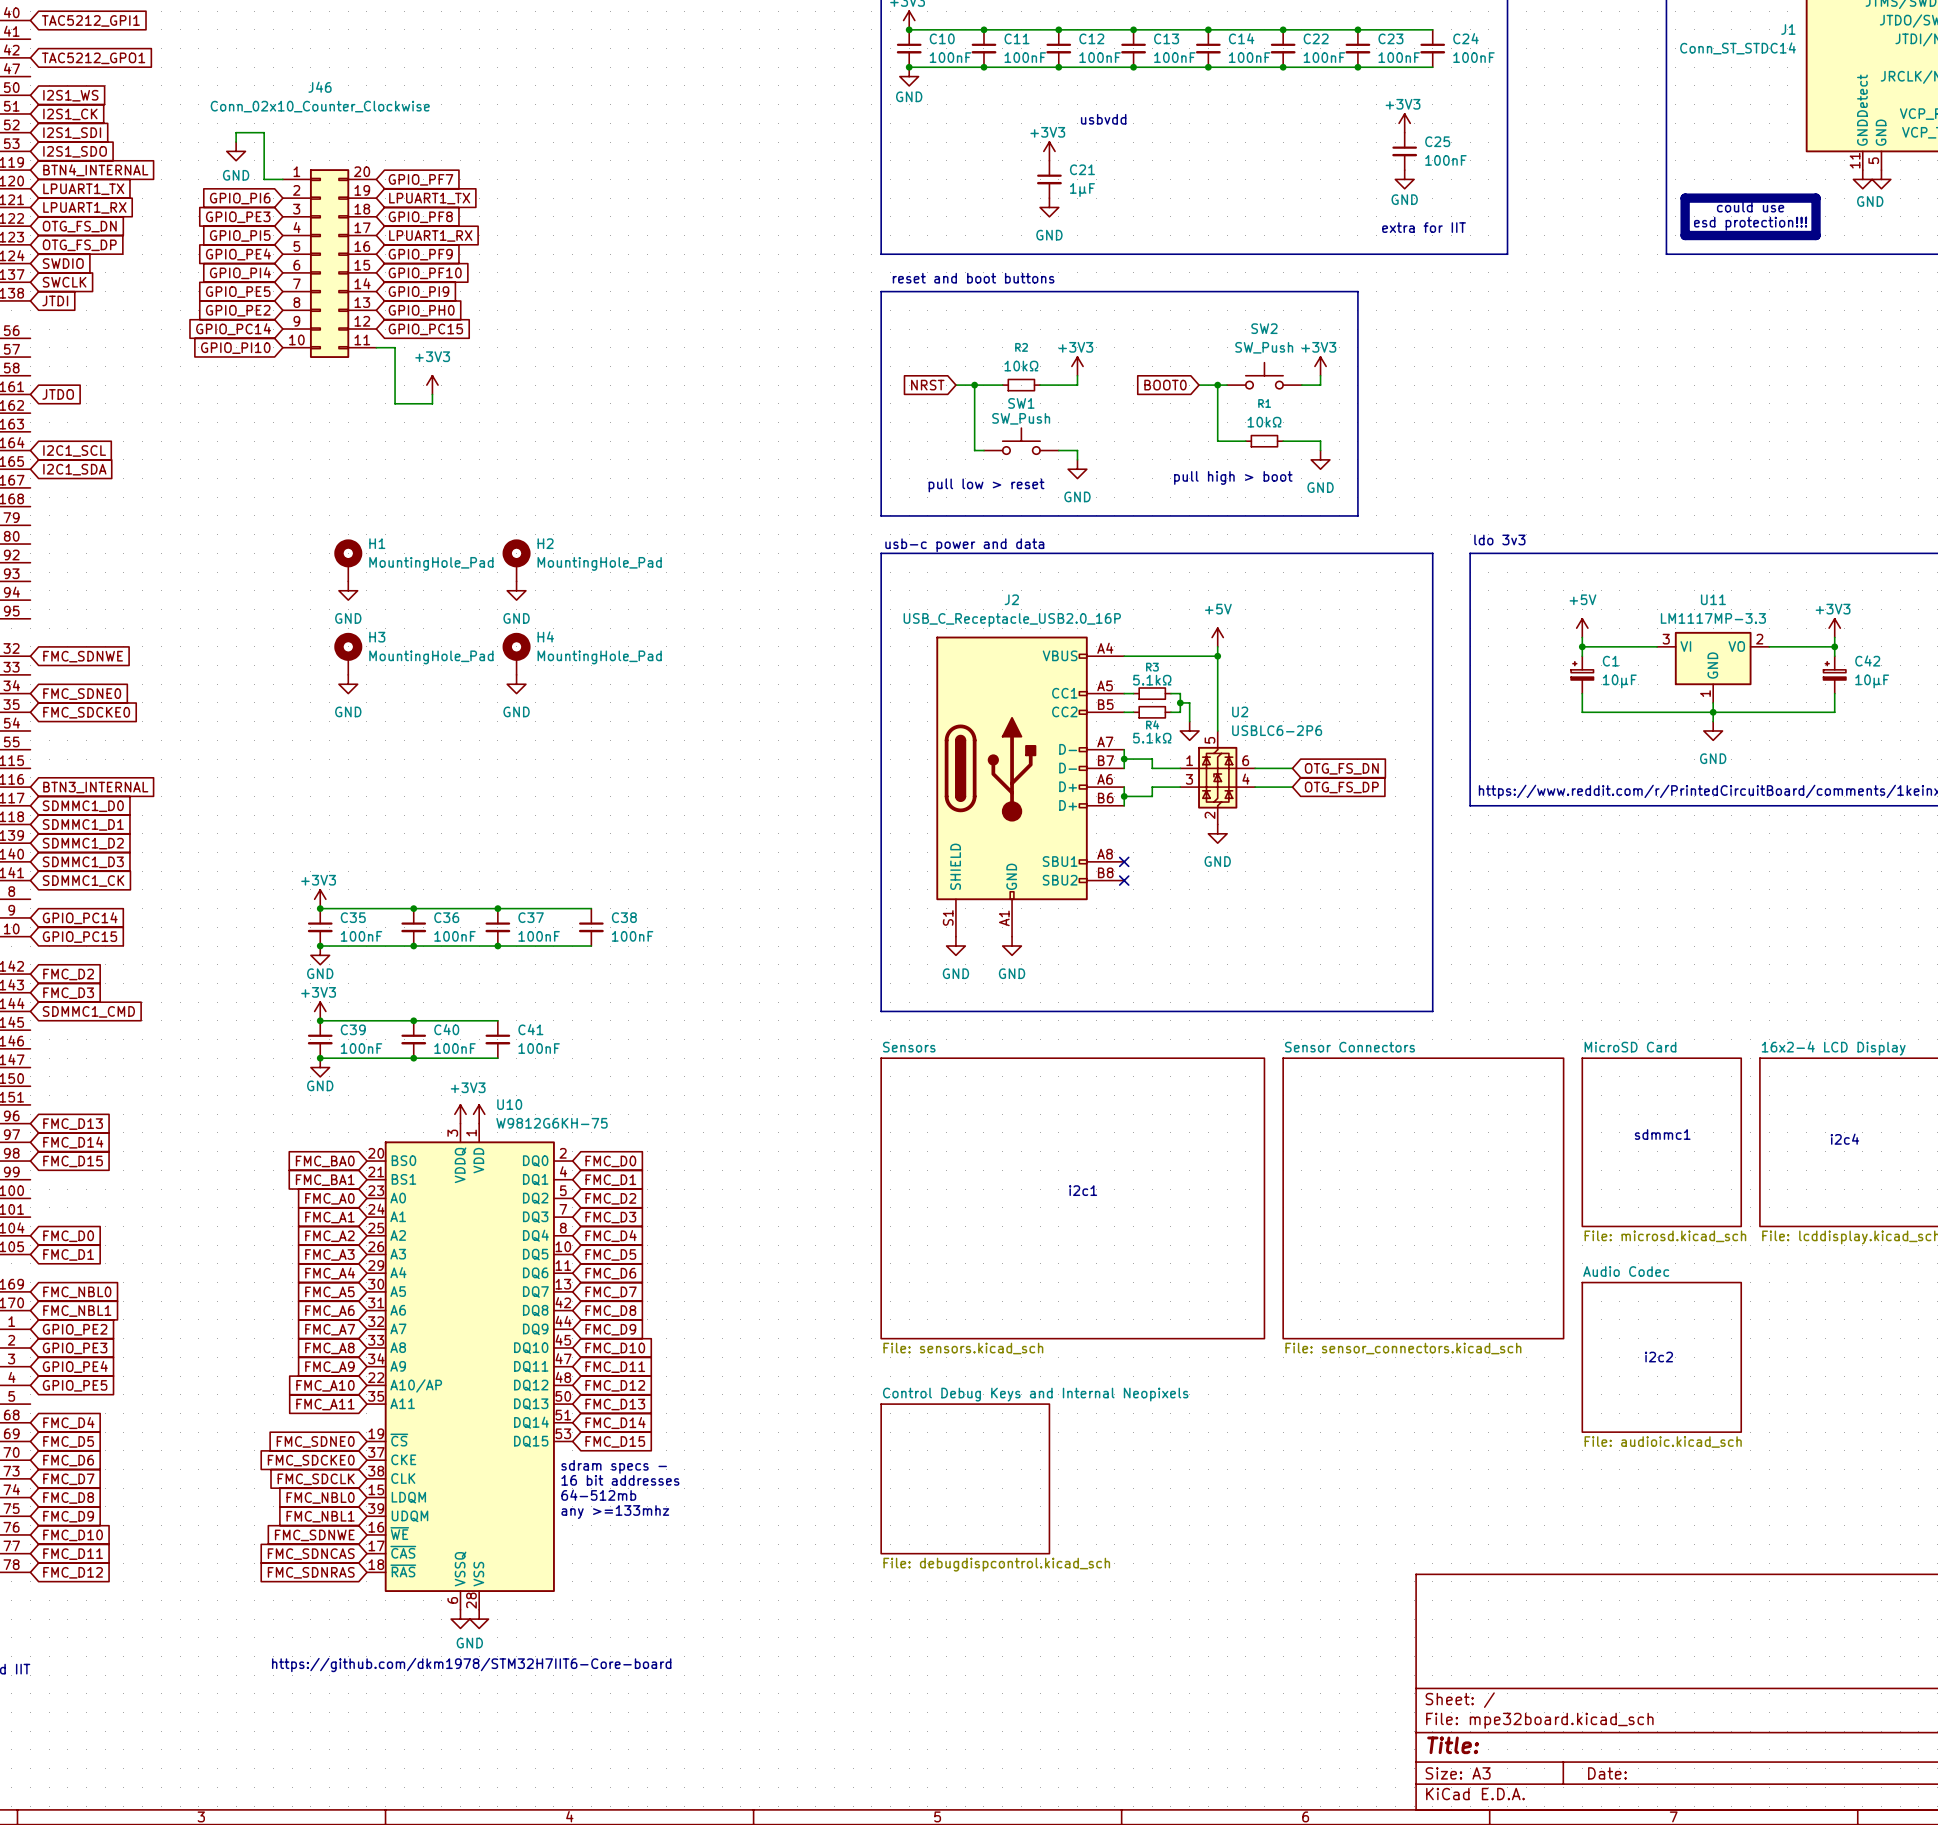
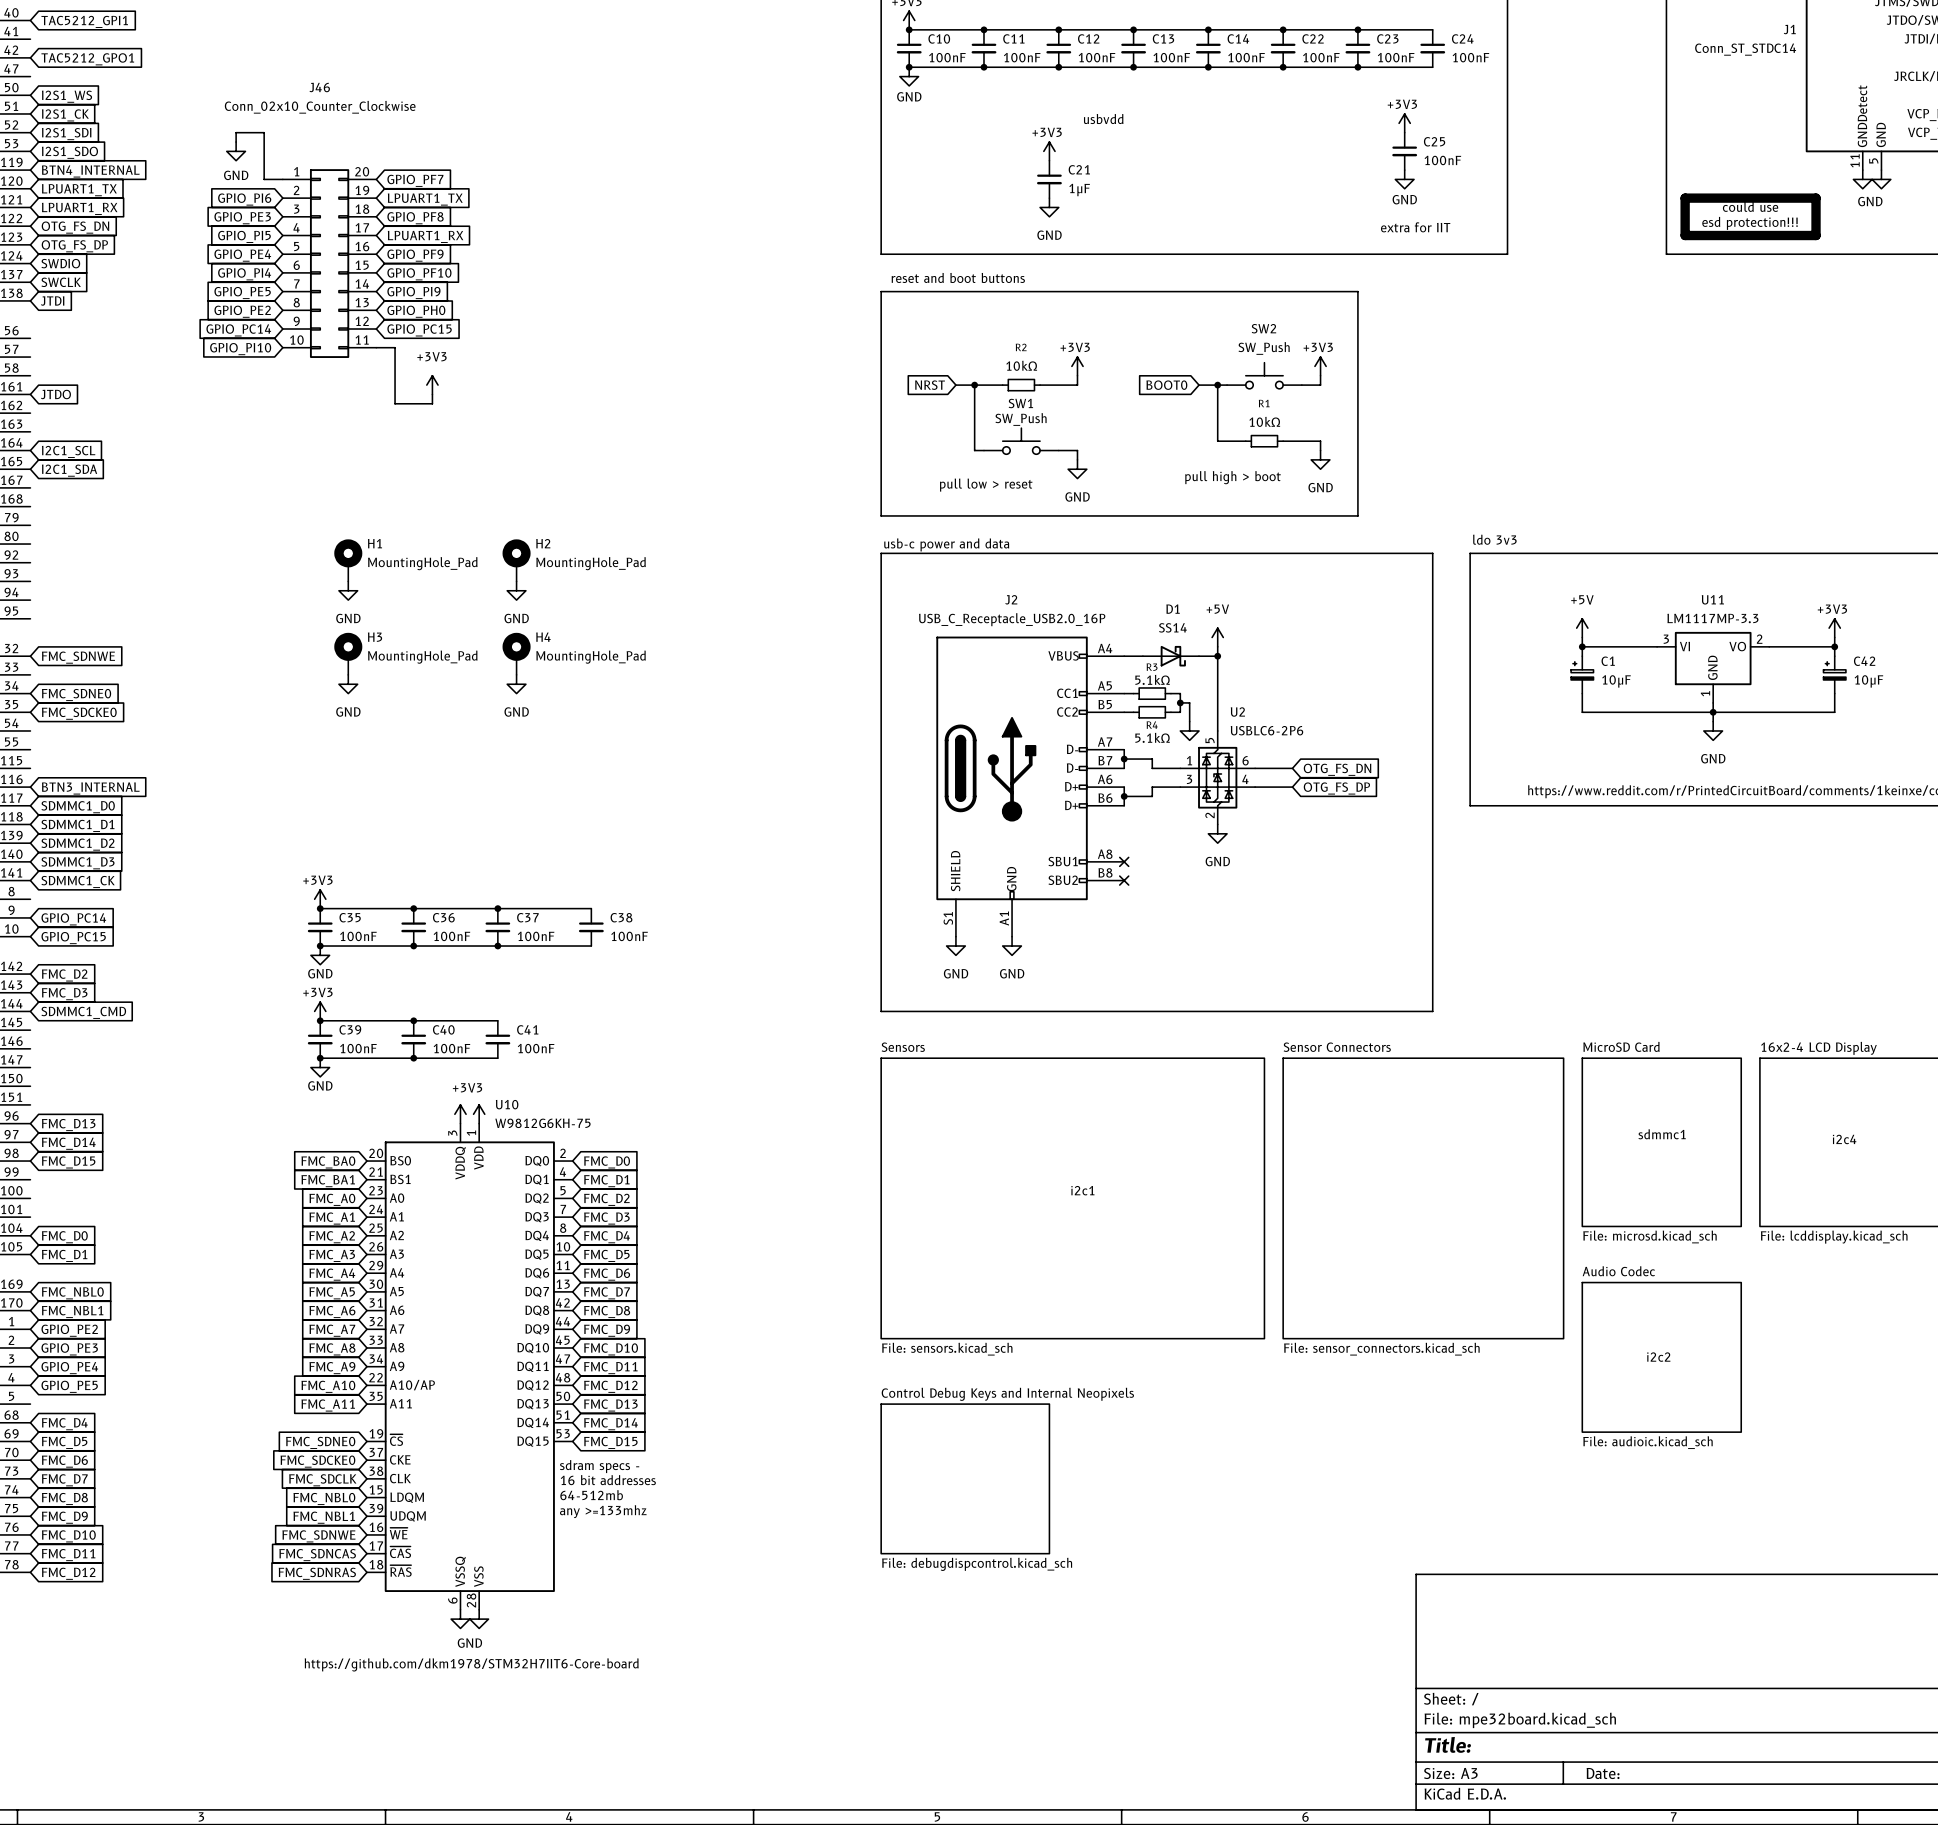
D1: none -> SS14 (1170, 656)

